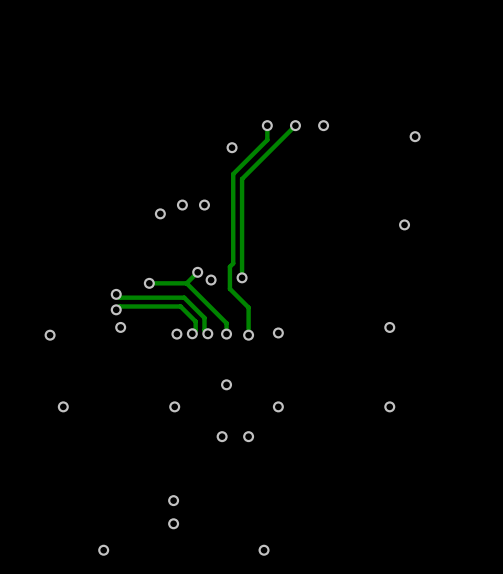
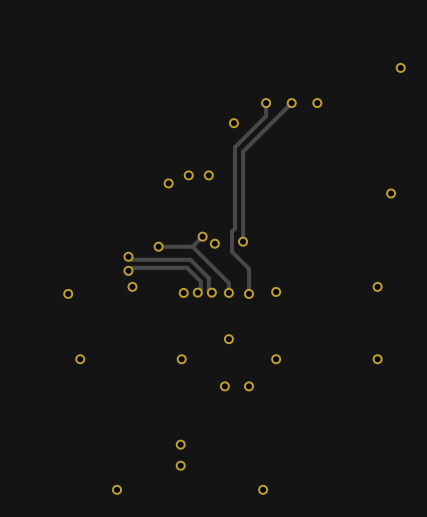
via position: (415, 136) -> (400, 67)

